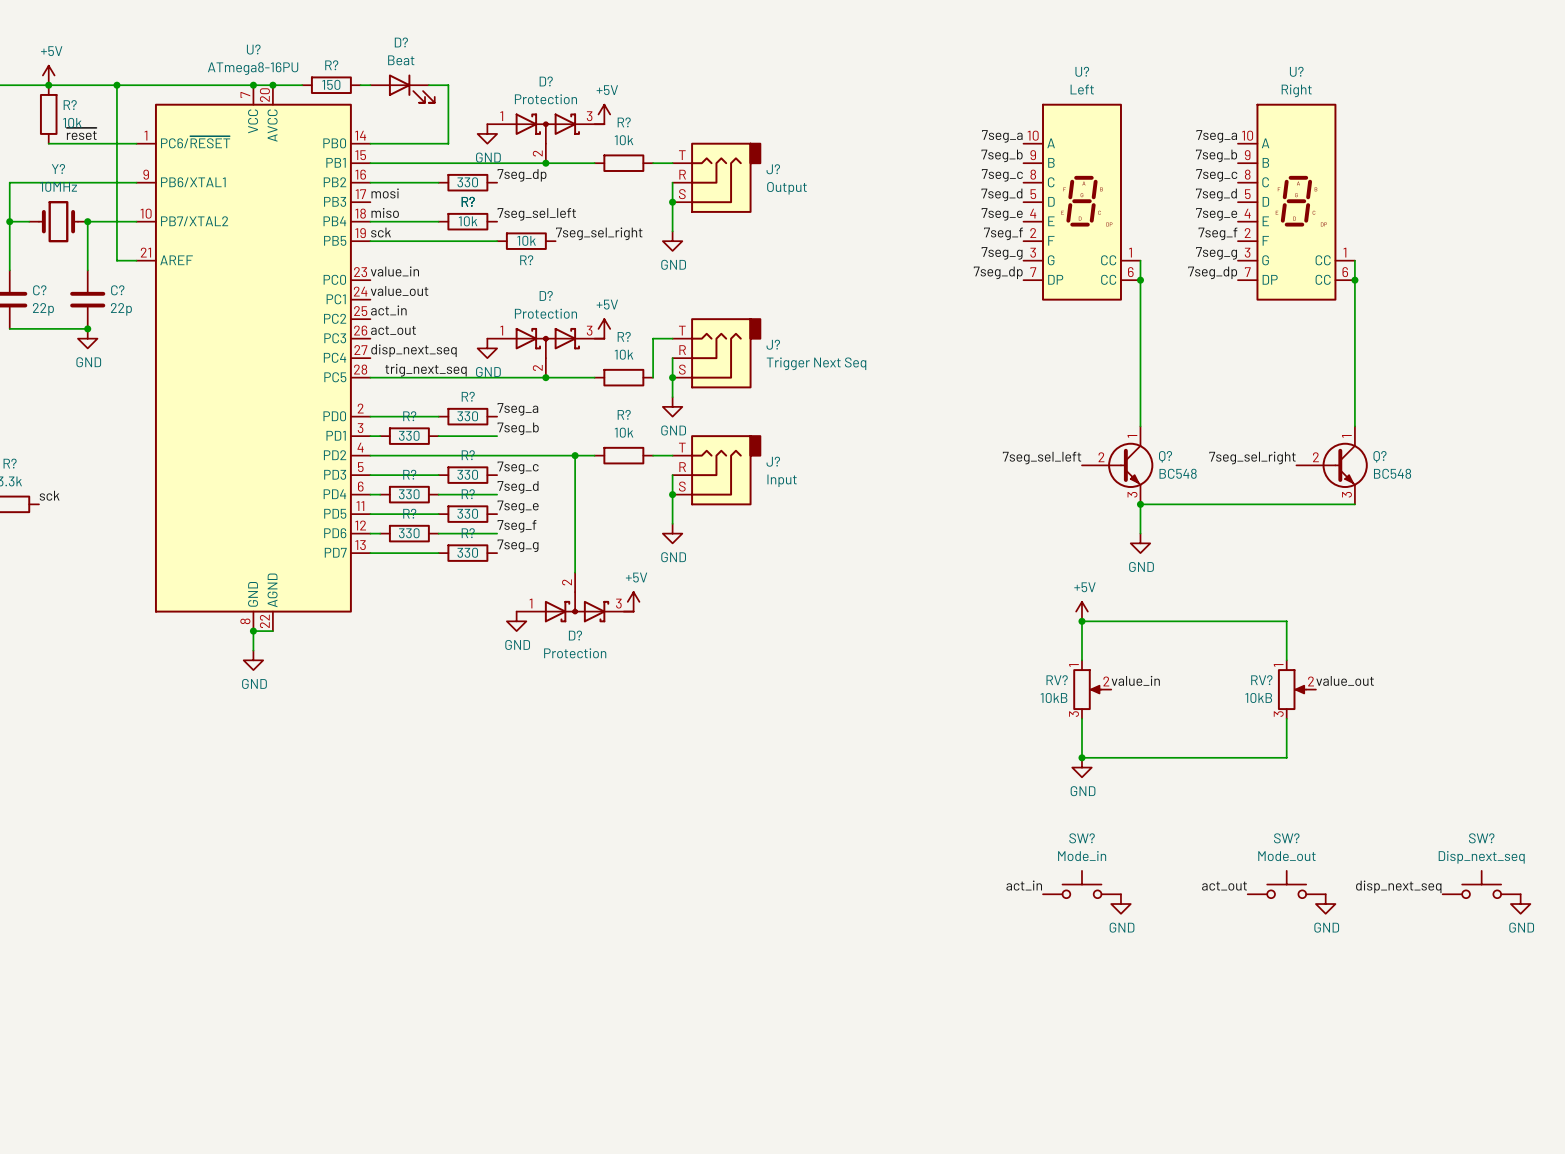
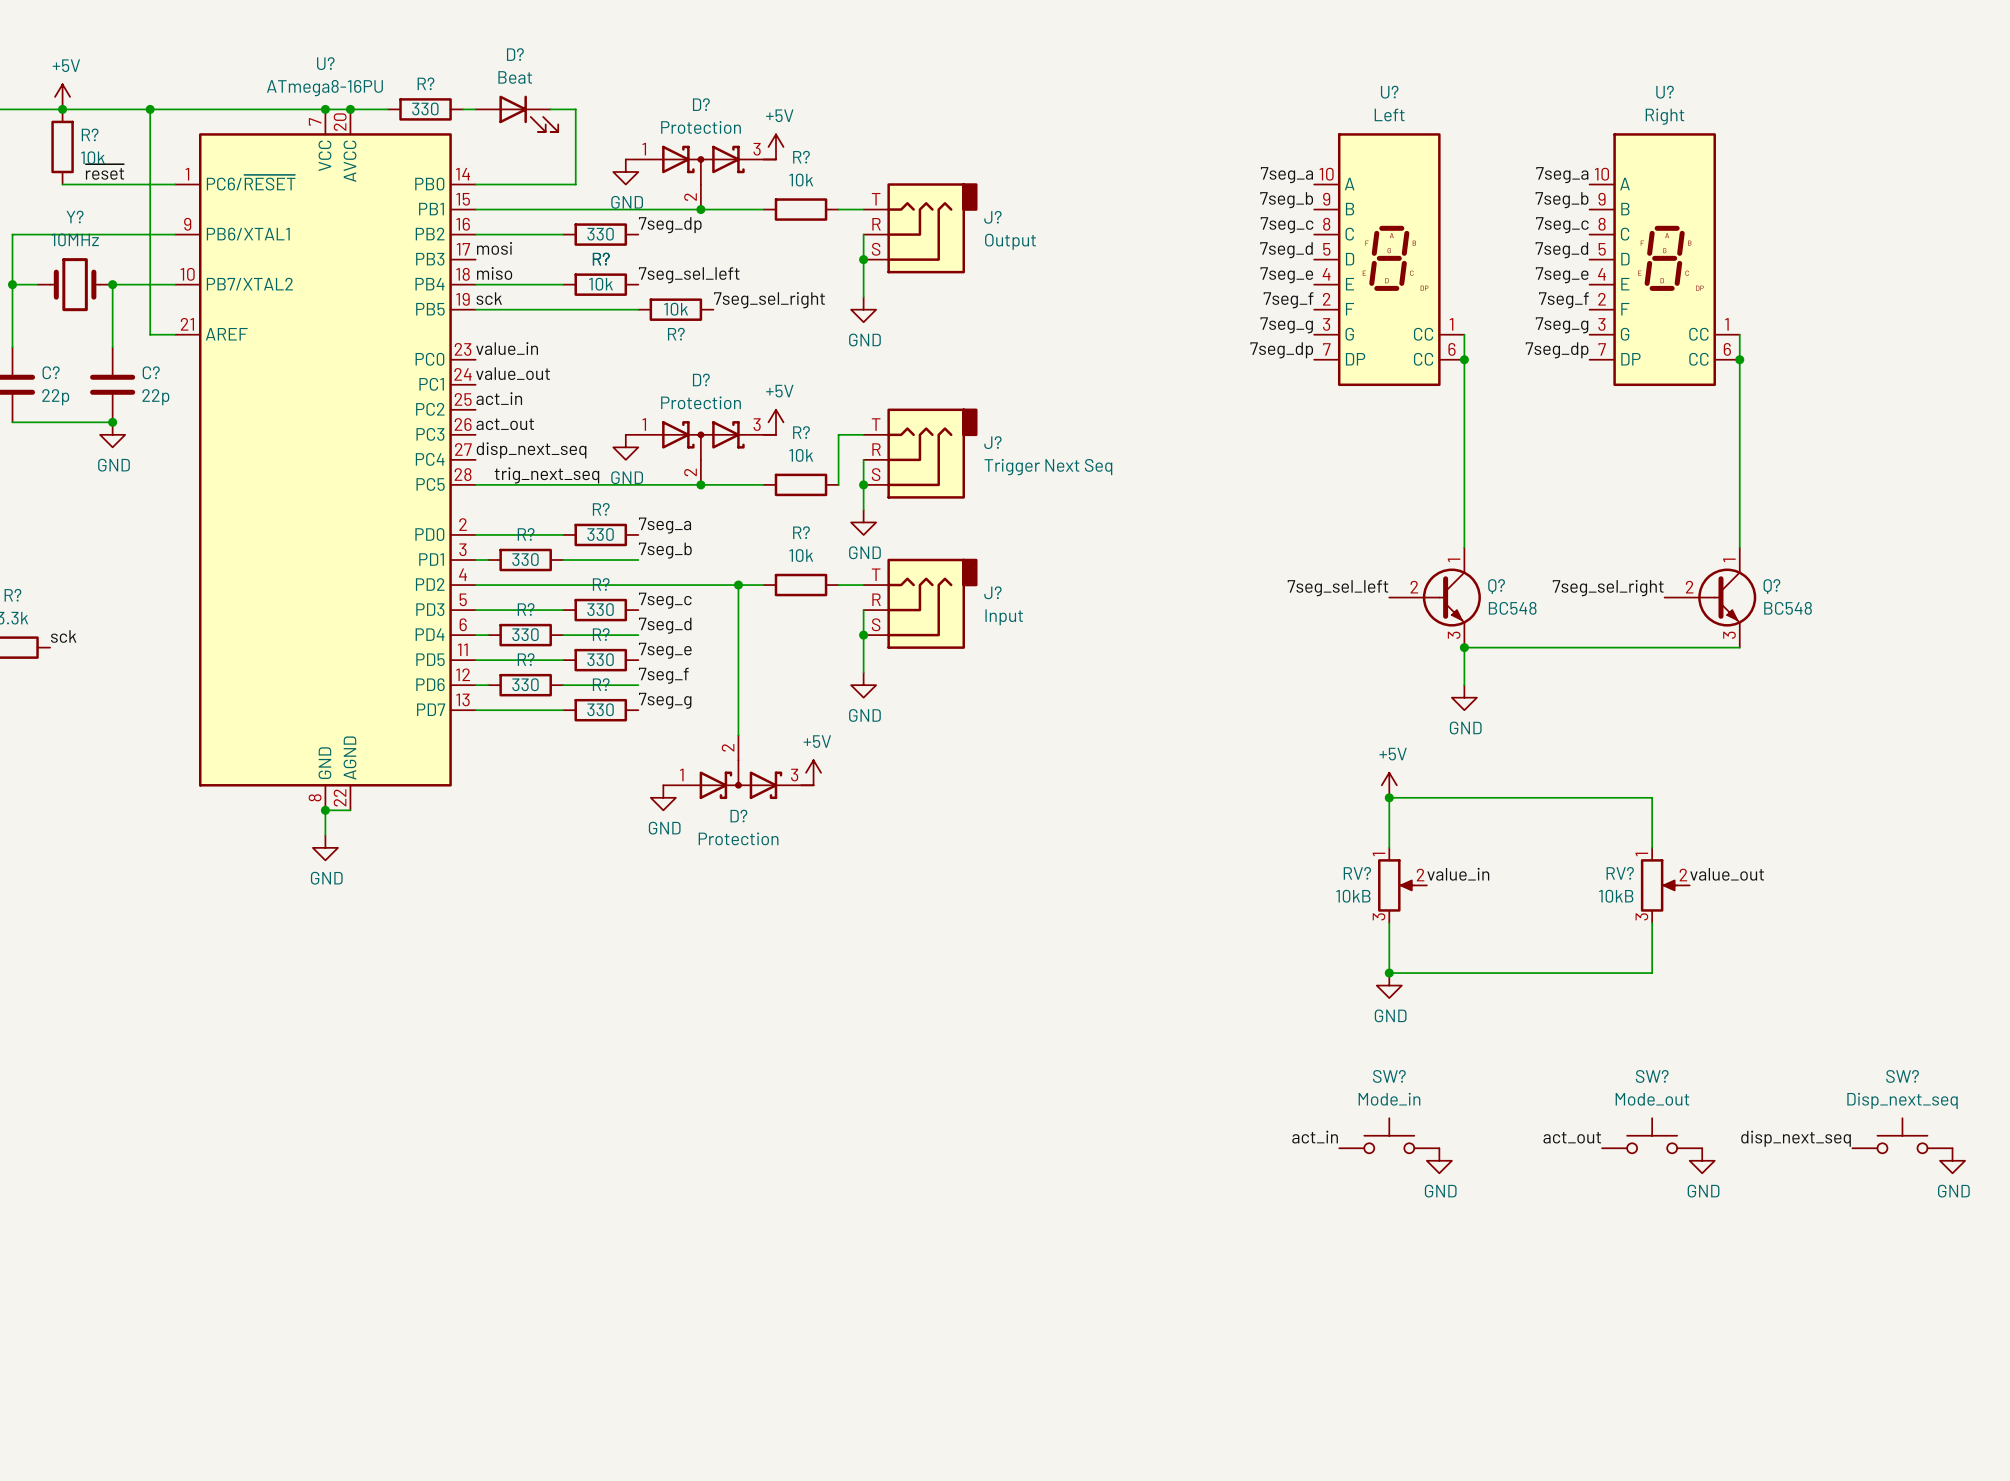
R? value: 150 (331, 84) -> 330 (425, 108)

